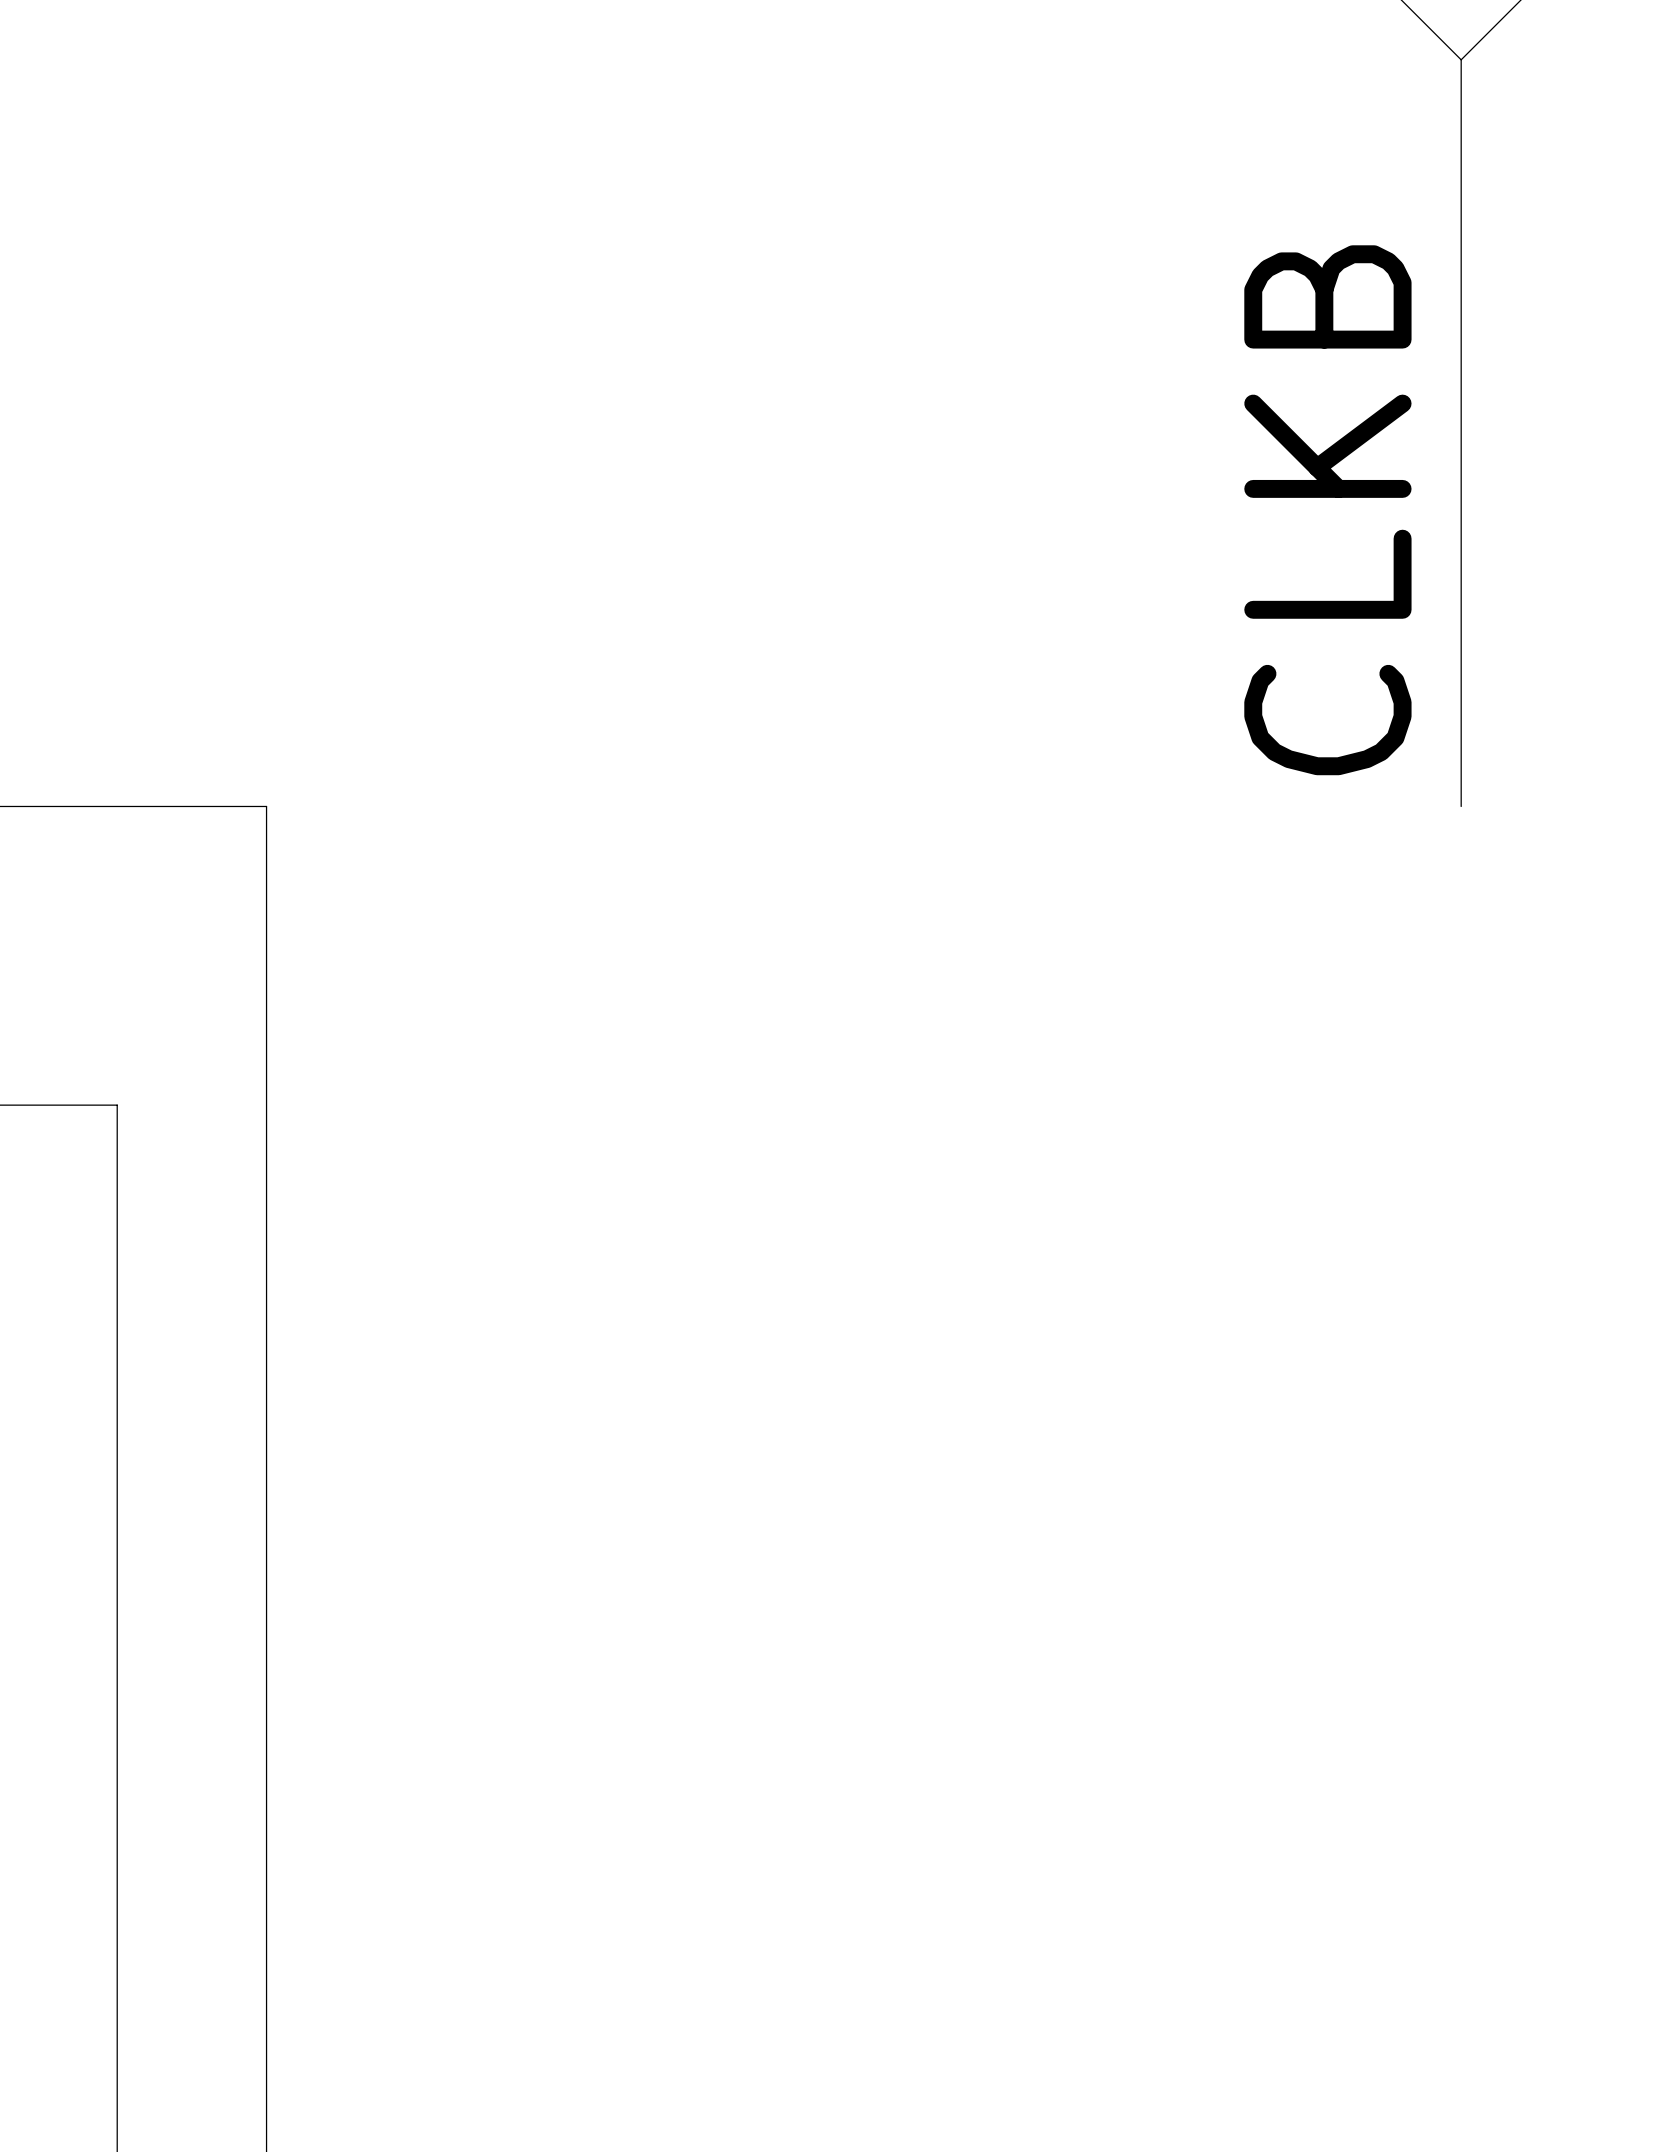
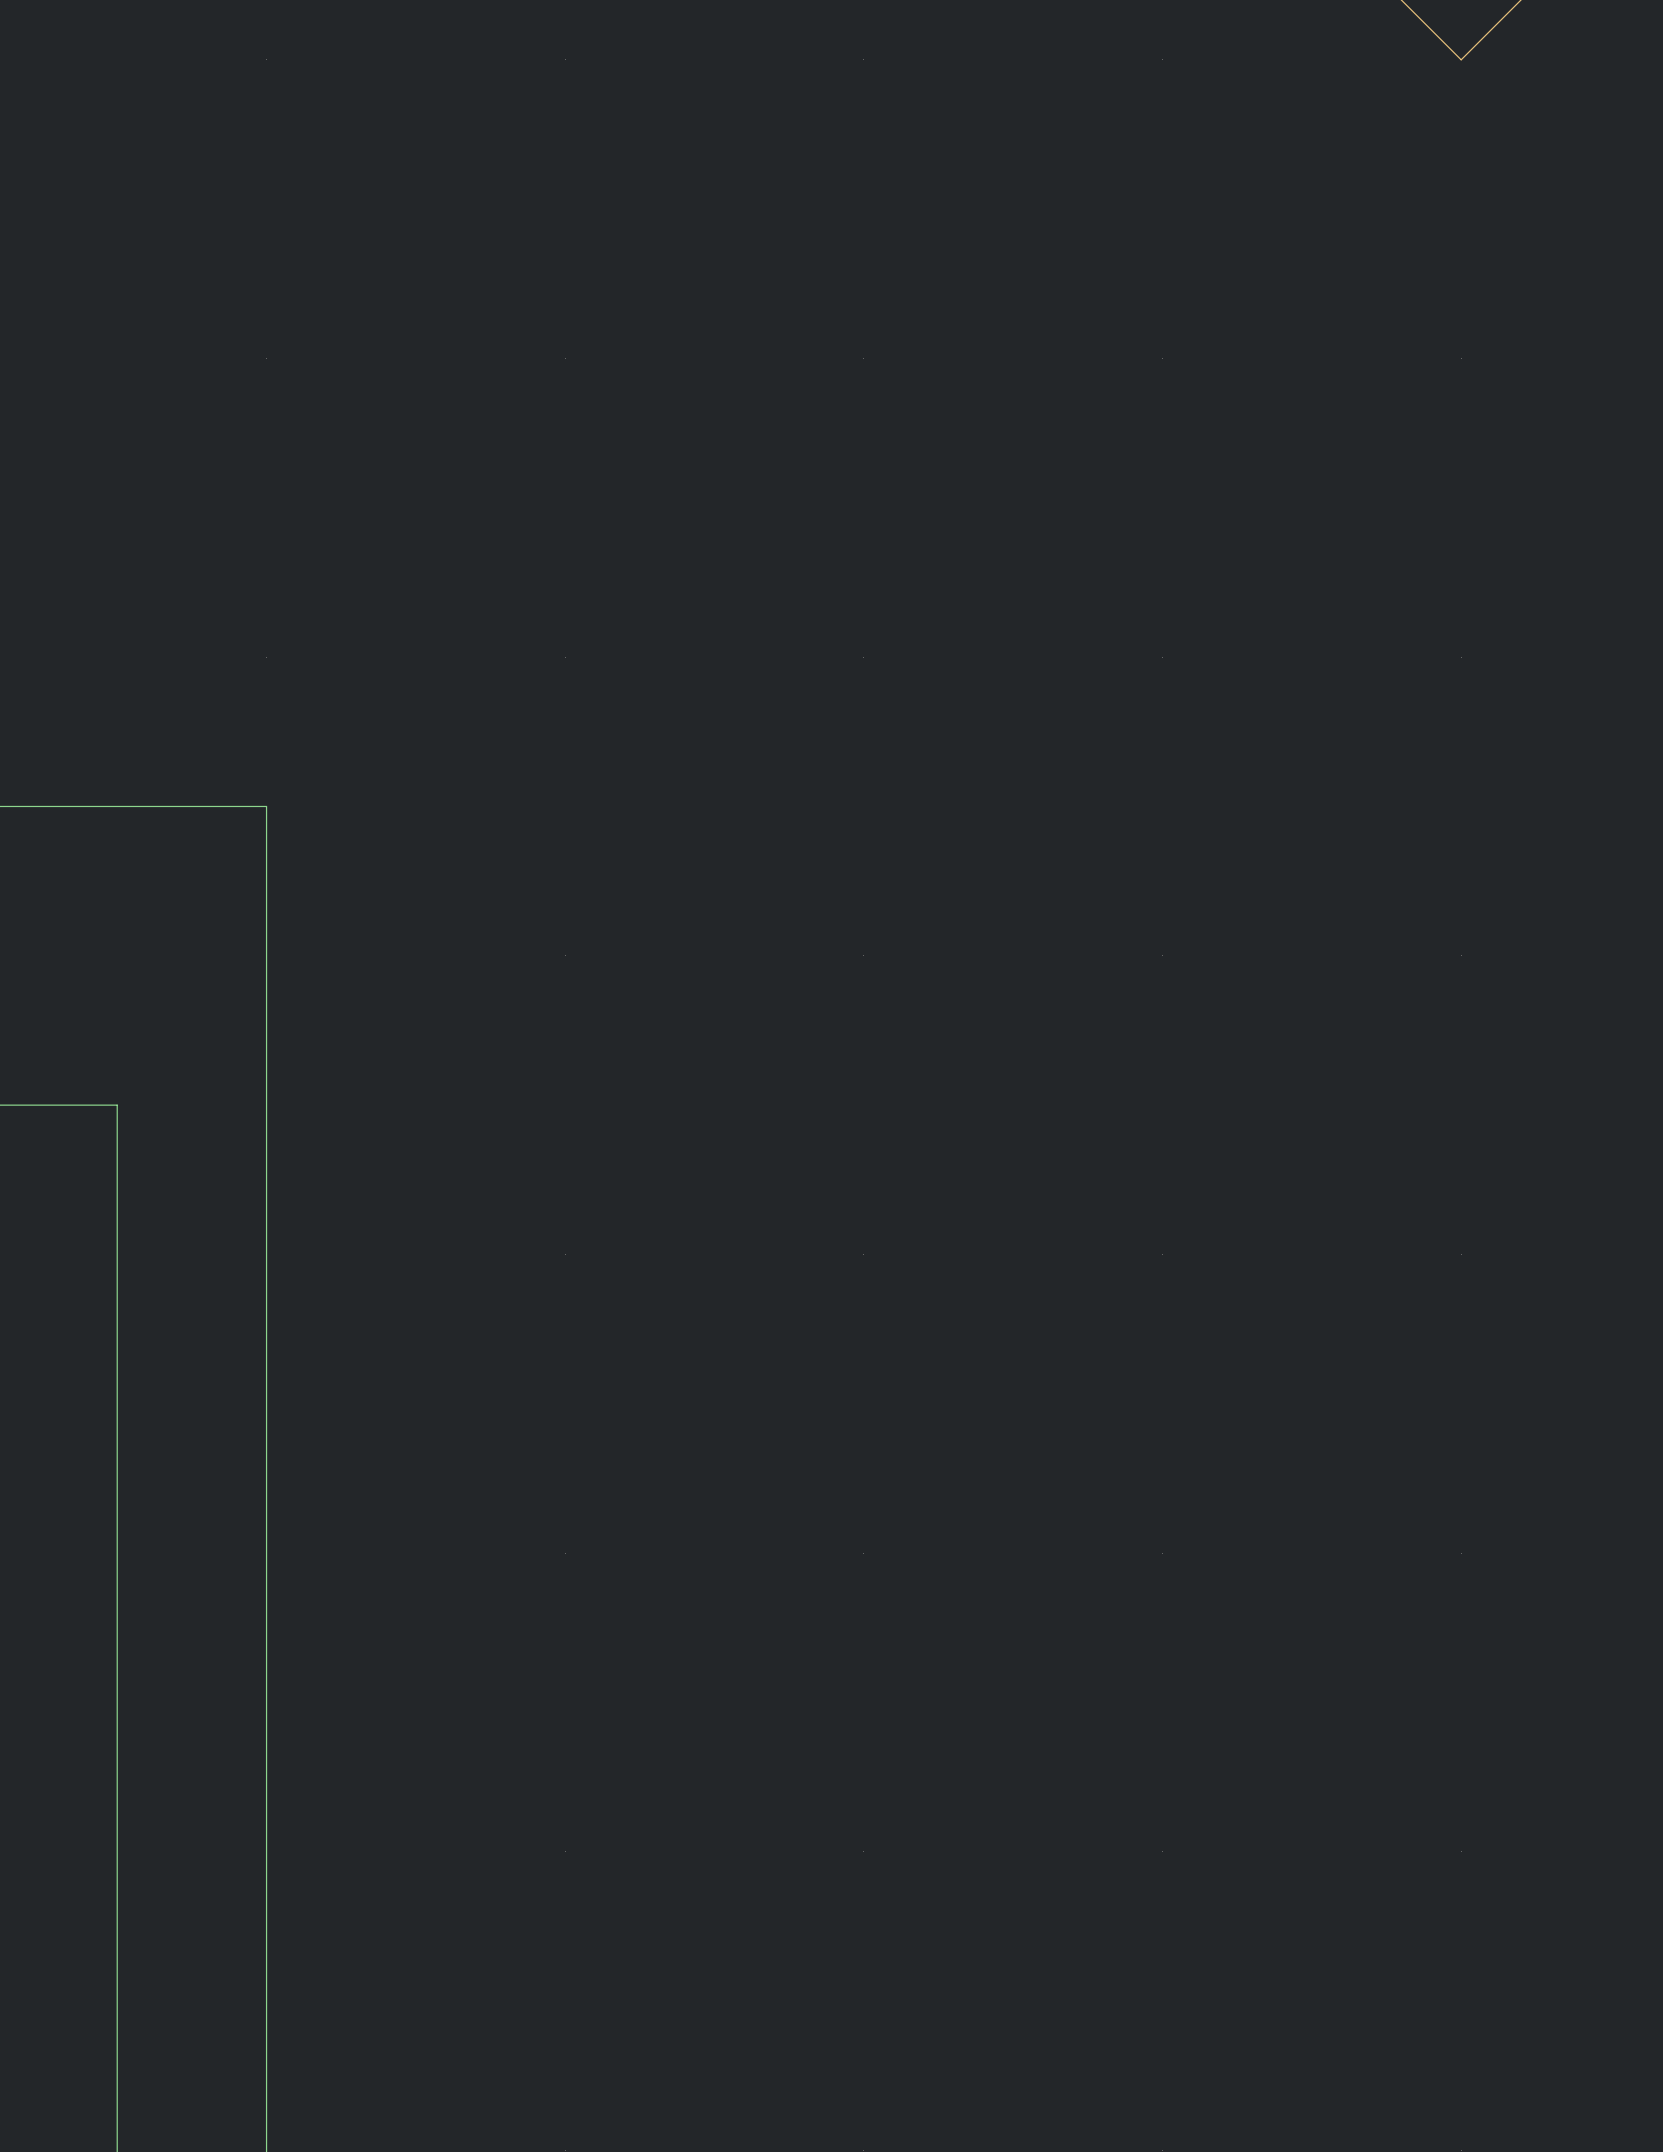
wire: (1461, 59) (1461, 806) -> none
label: CLKB (1327, 510) -> none

